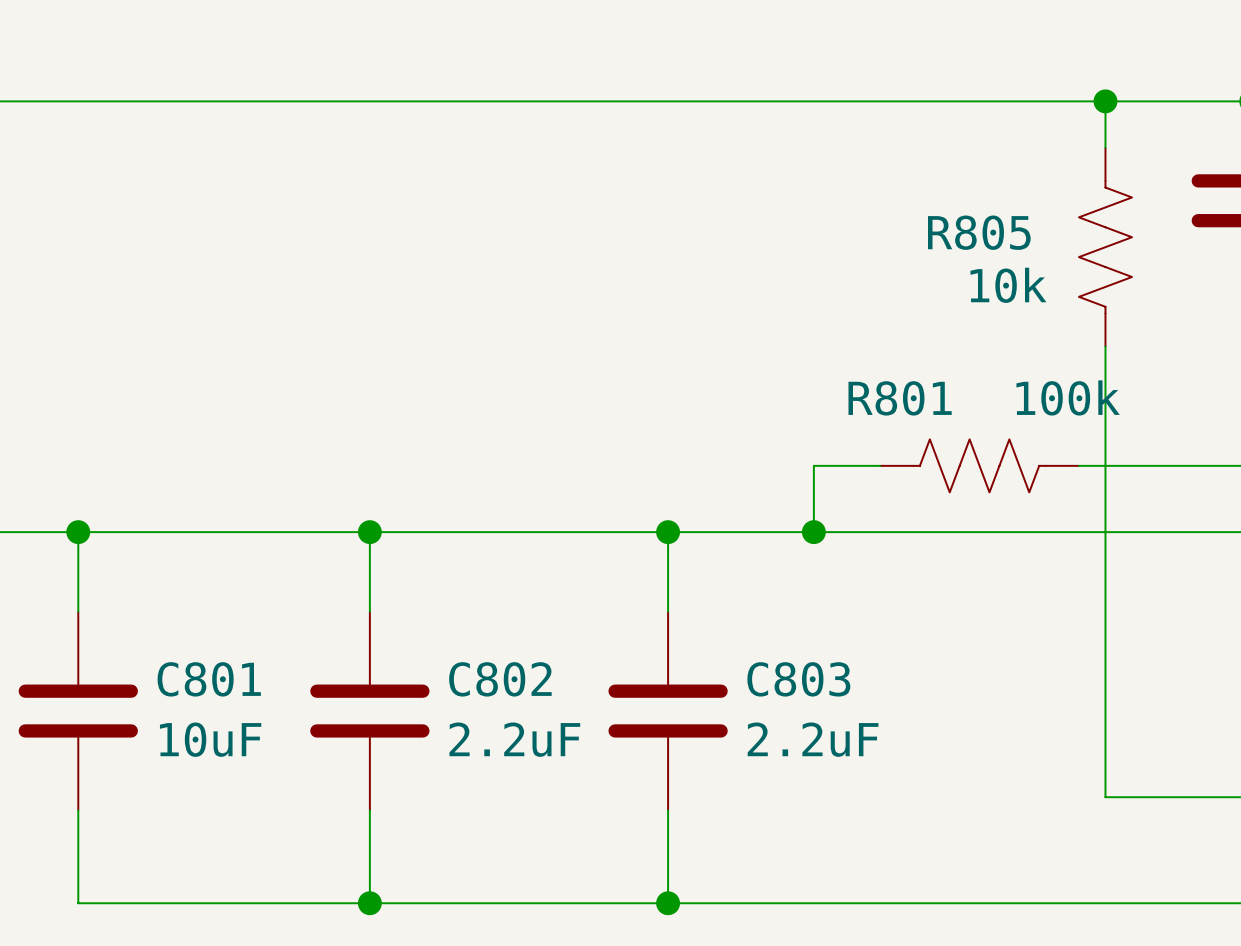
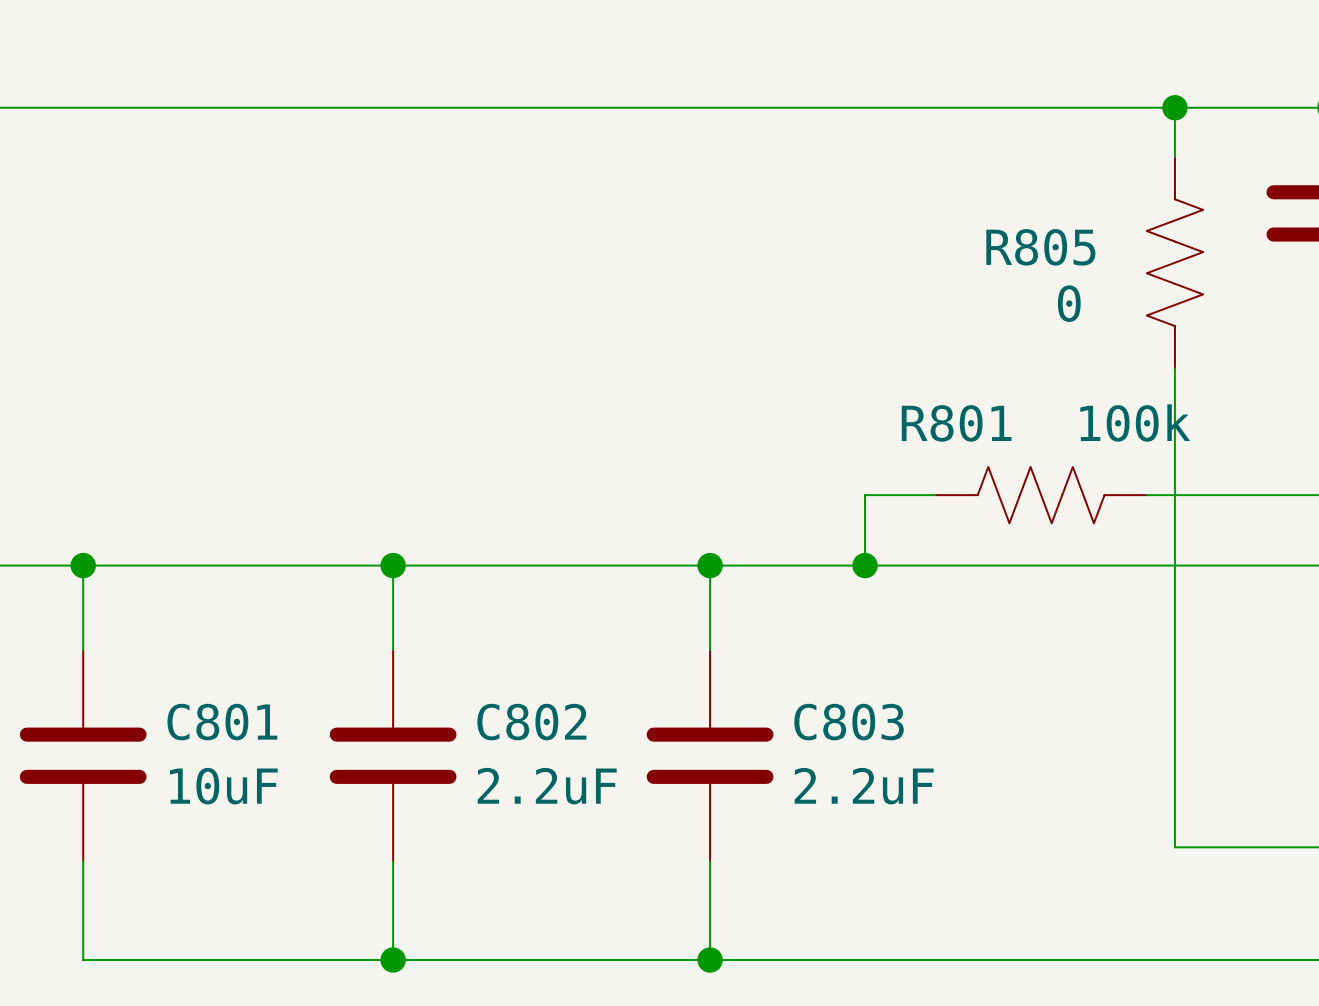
R805 value: 10k (1008, 285) -> 0 (1069, 303)

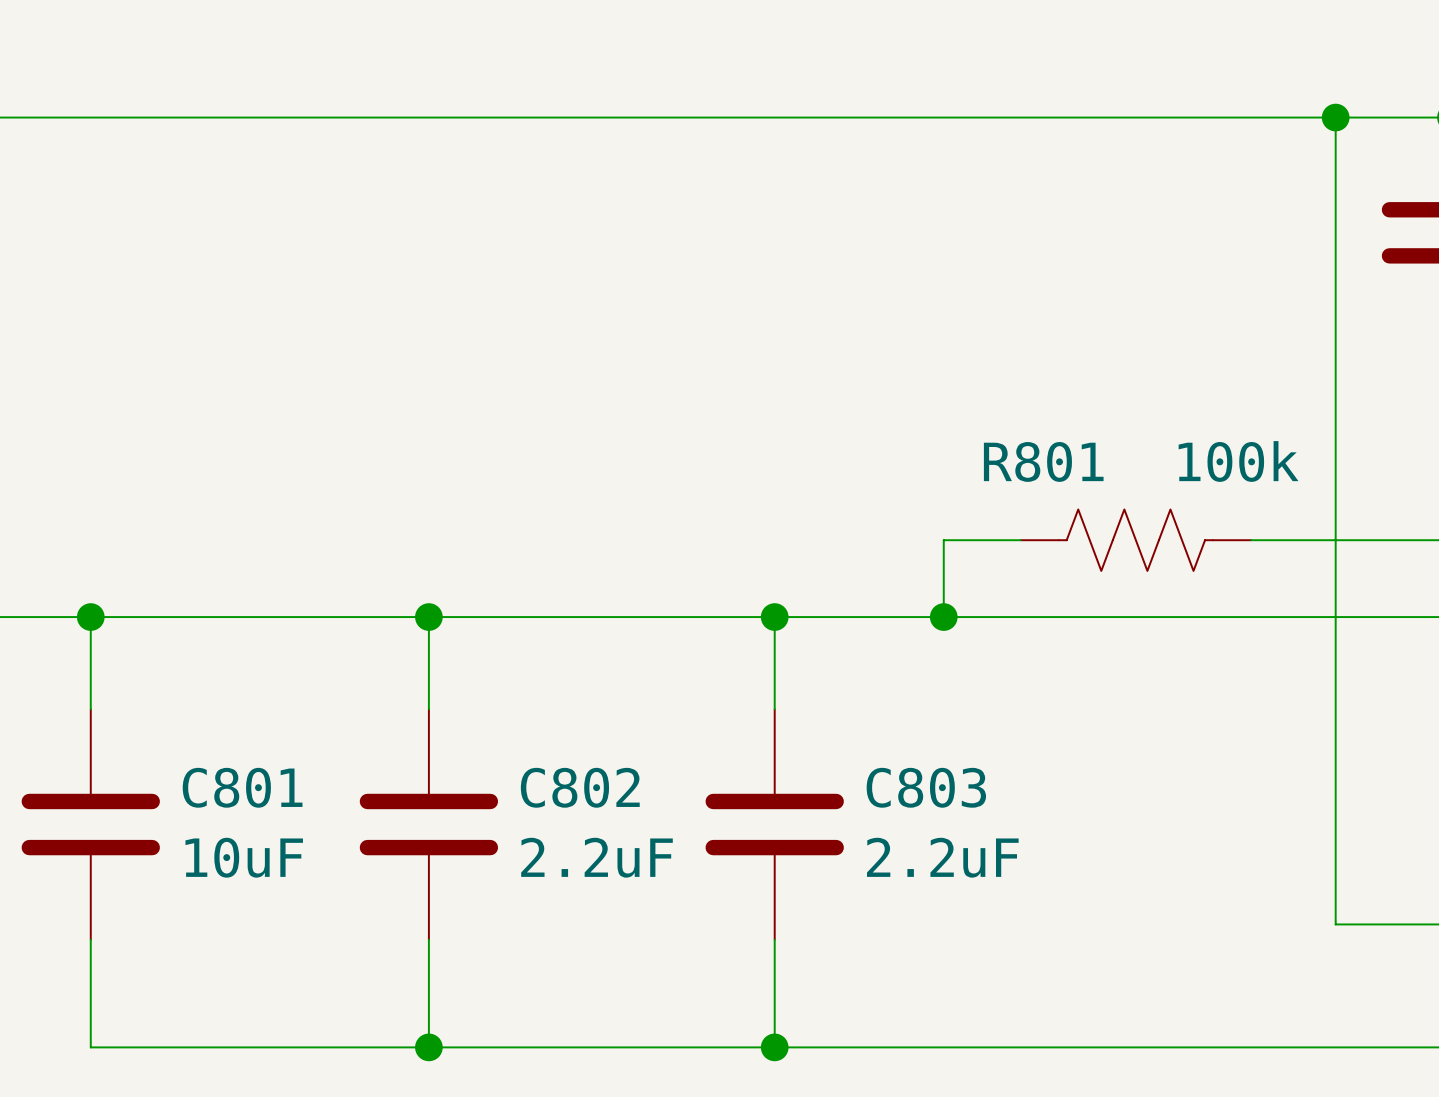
wire: (1174, 107) (1174, 157) -> none
junction position: (1174, 107) -> (1335, 117)
R805: 0 (1174, 262) -> none
wire: (1174, 368) (1174, 847) (1224, 847) -> (1335, 117) (1335, 924)

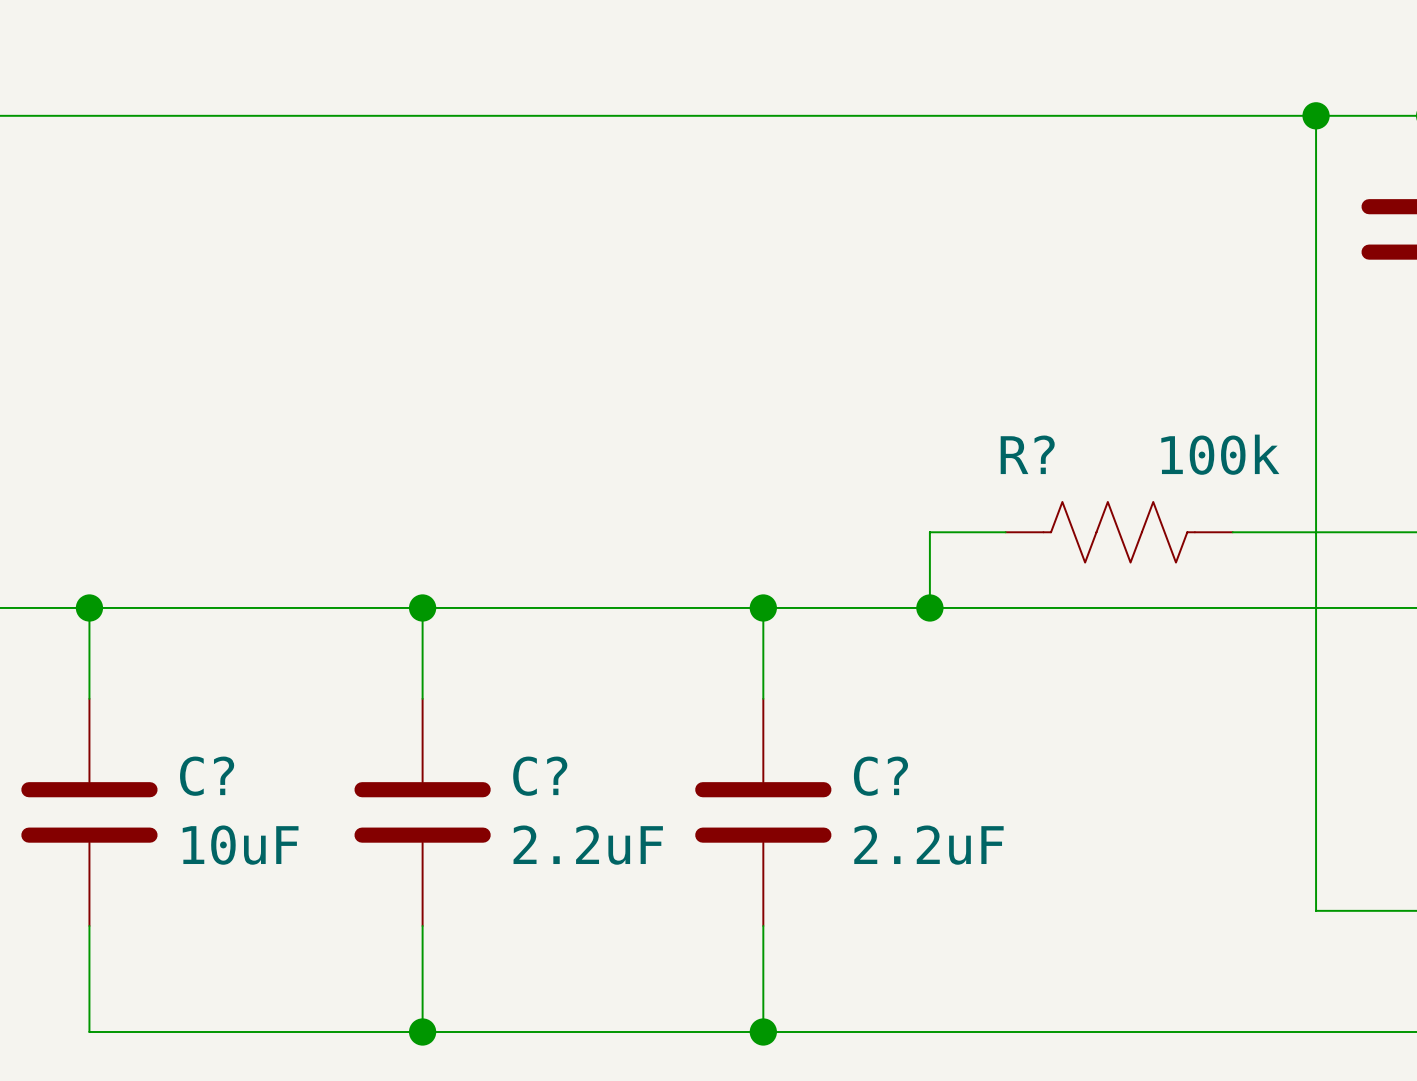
R801 name: R801 (1043, 461) -> R? (1027, 454)
C801 name: C801 (242, 787) -> C? (207, 776)
C802 name: C802 (580, 787) -> C? (540, 776)
C803 name: C803 (926, 787) -> C? (880, 776)

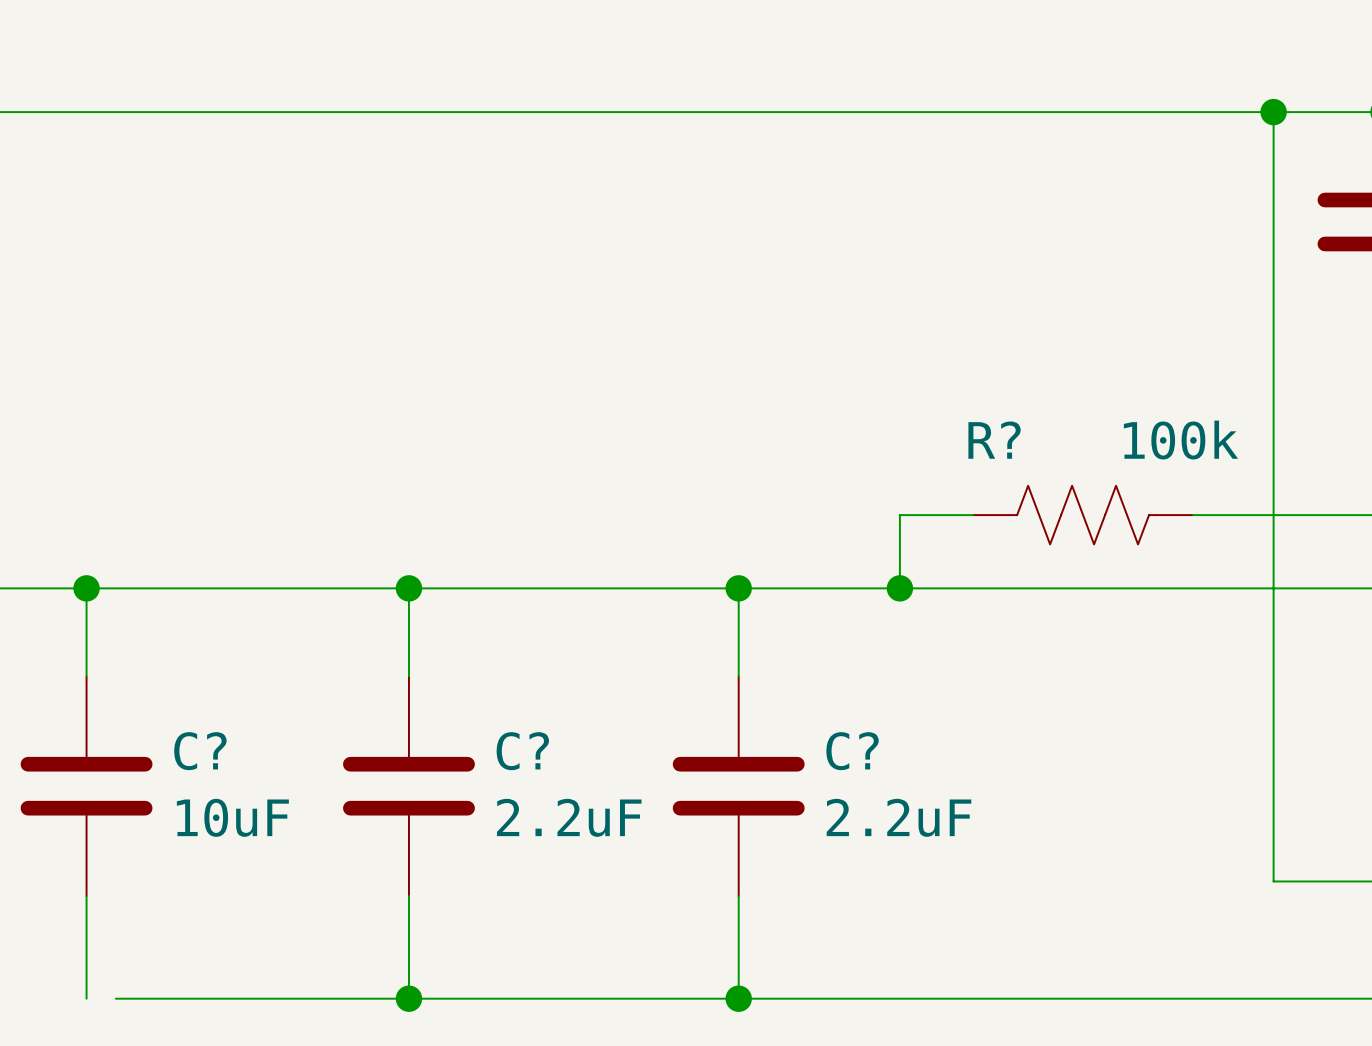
wire: (89, 1032) (119, 1032) -> none

